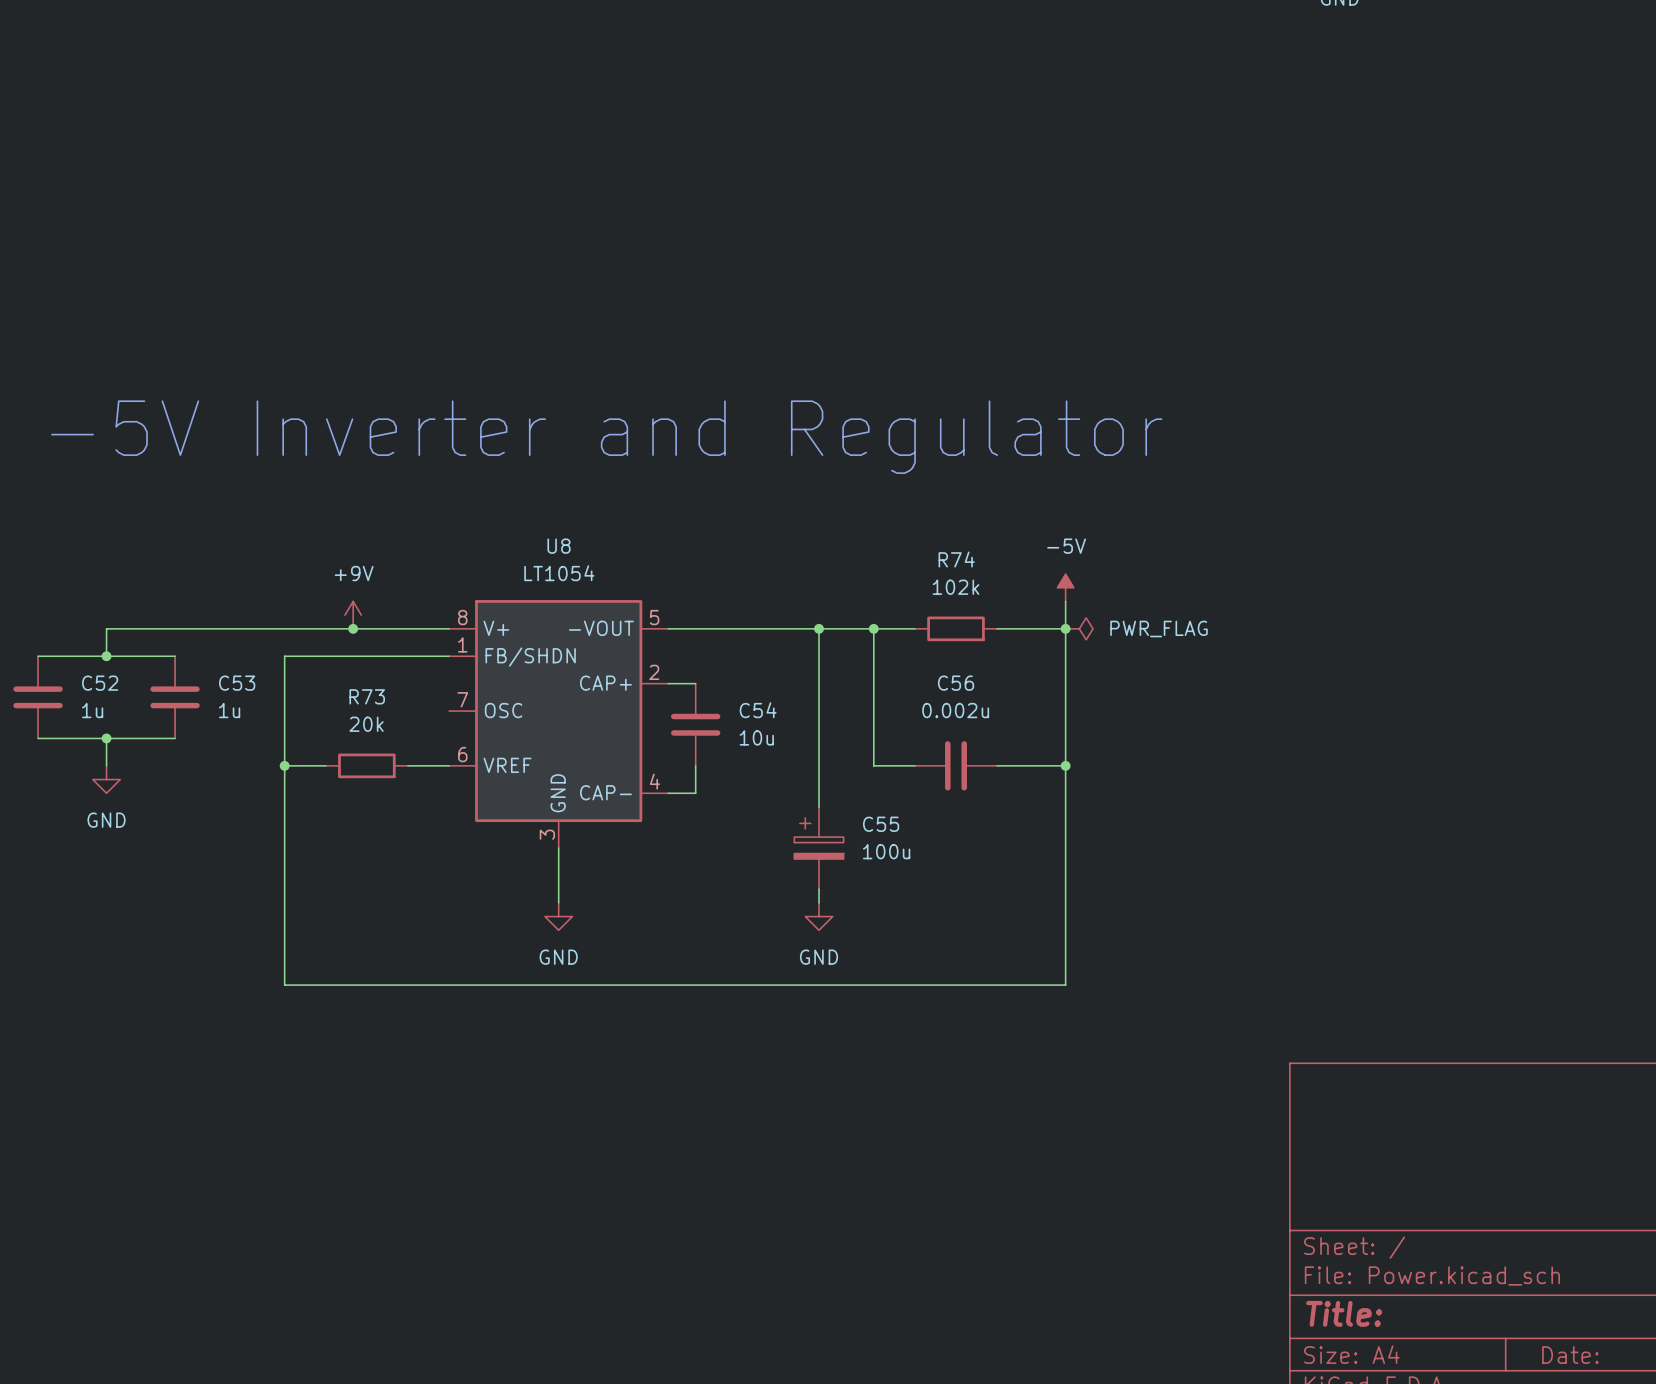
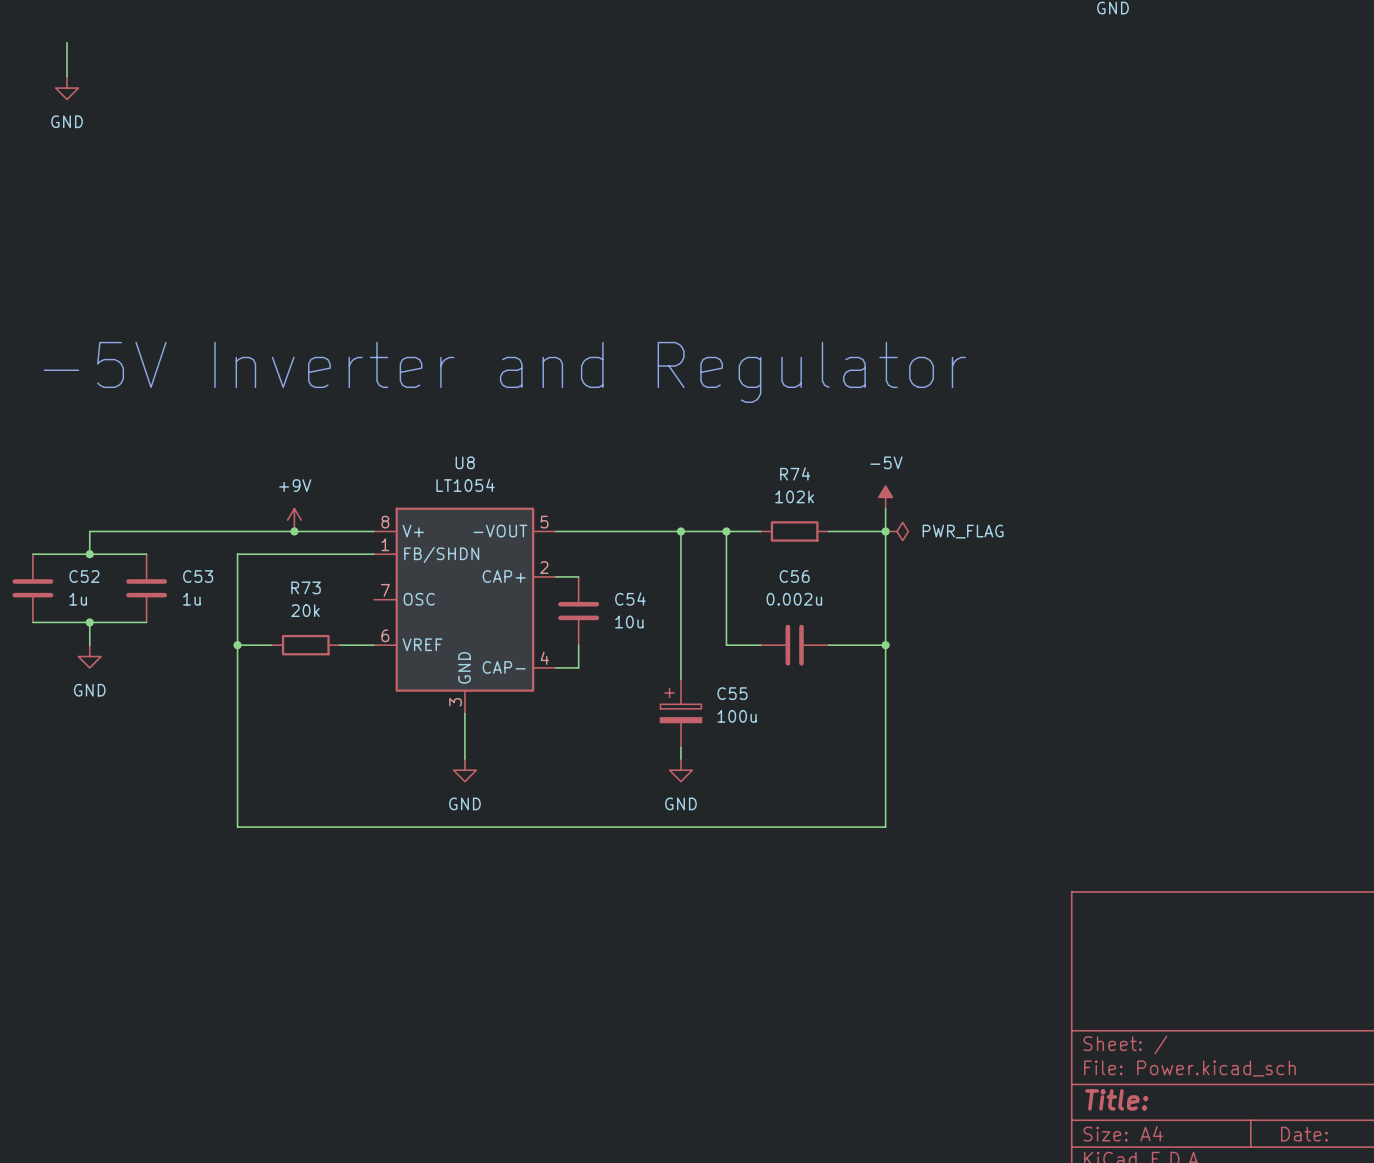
wire: none -> (67, 42) (67, 76)
power symbol: none -> GND (67, 88)

